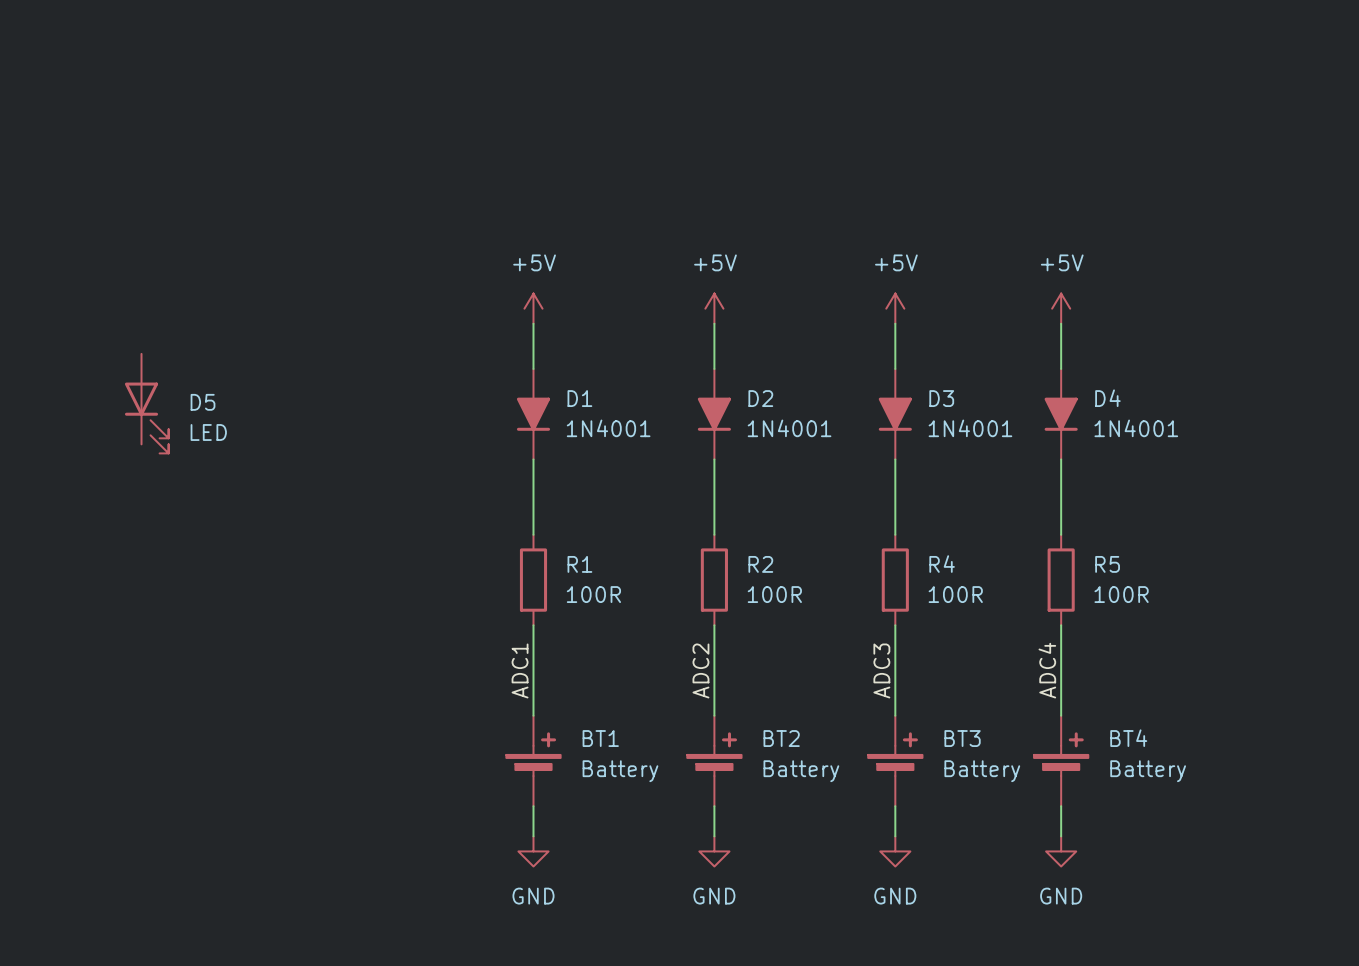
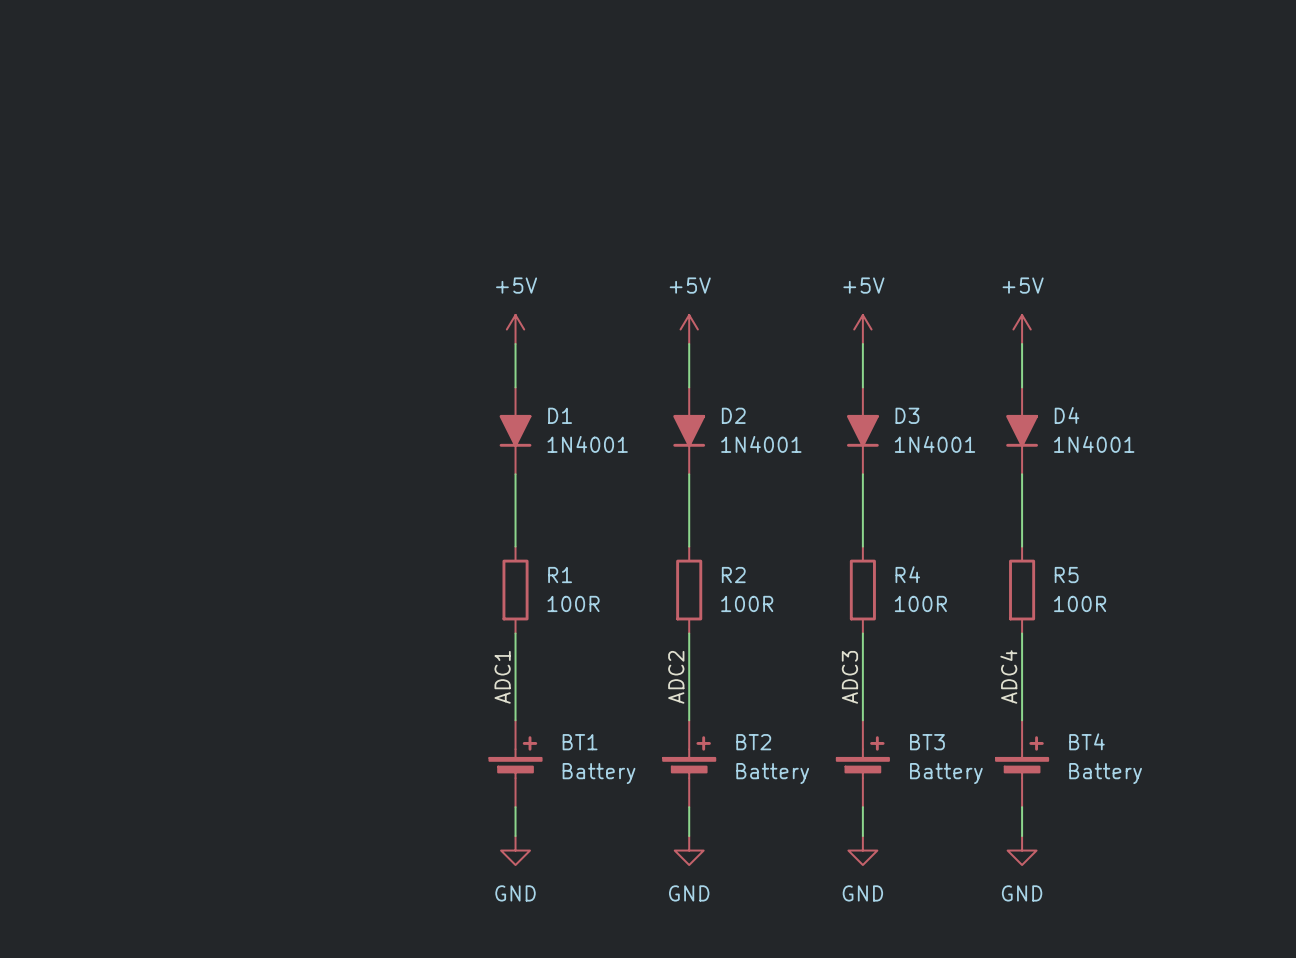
D5: LED (146, 403) -> none

